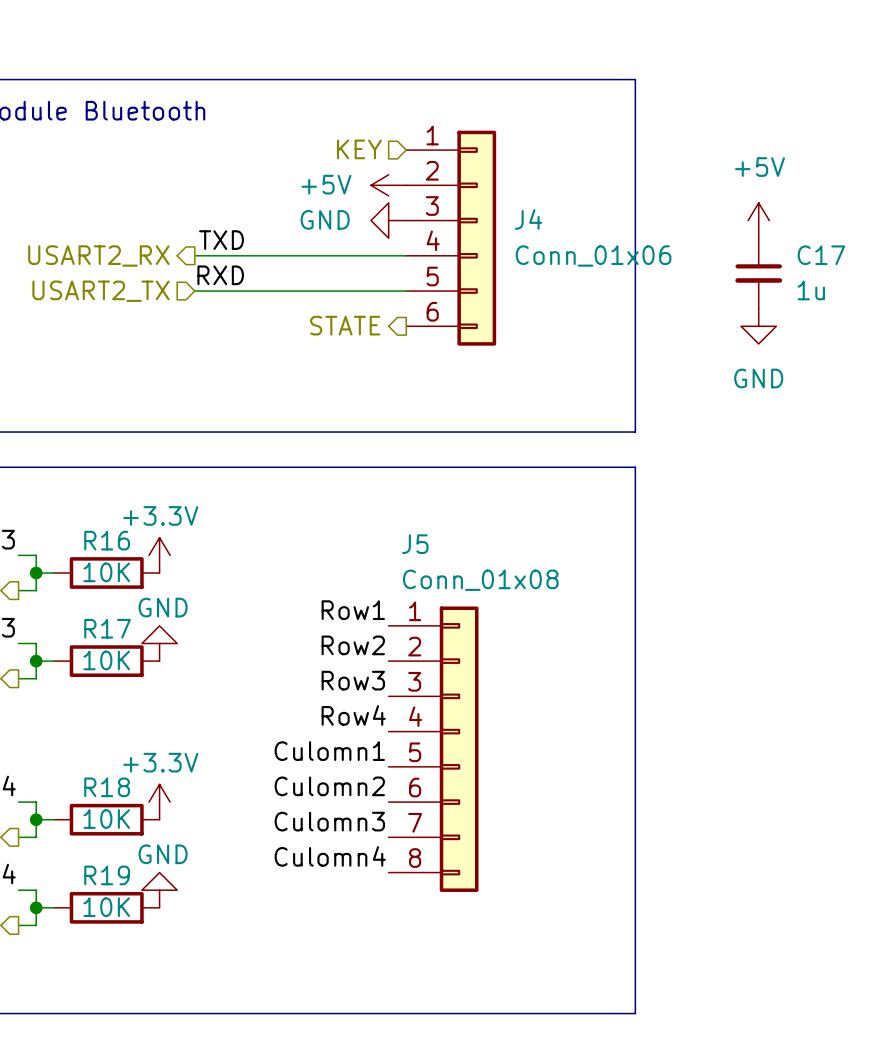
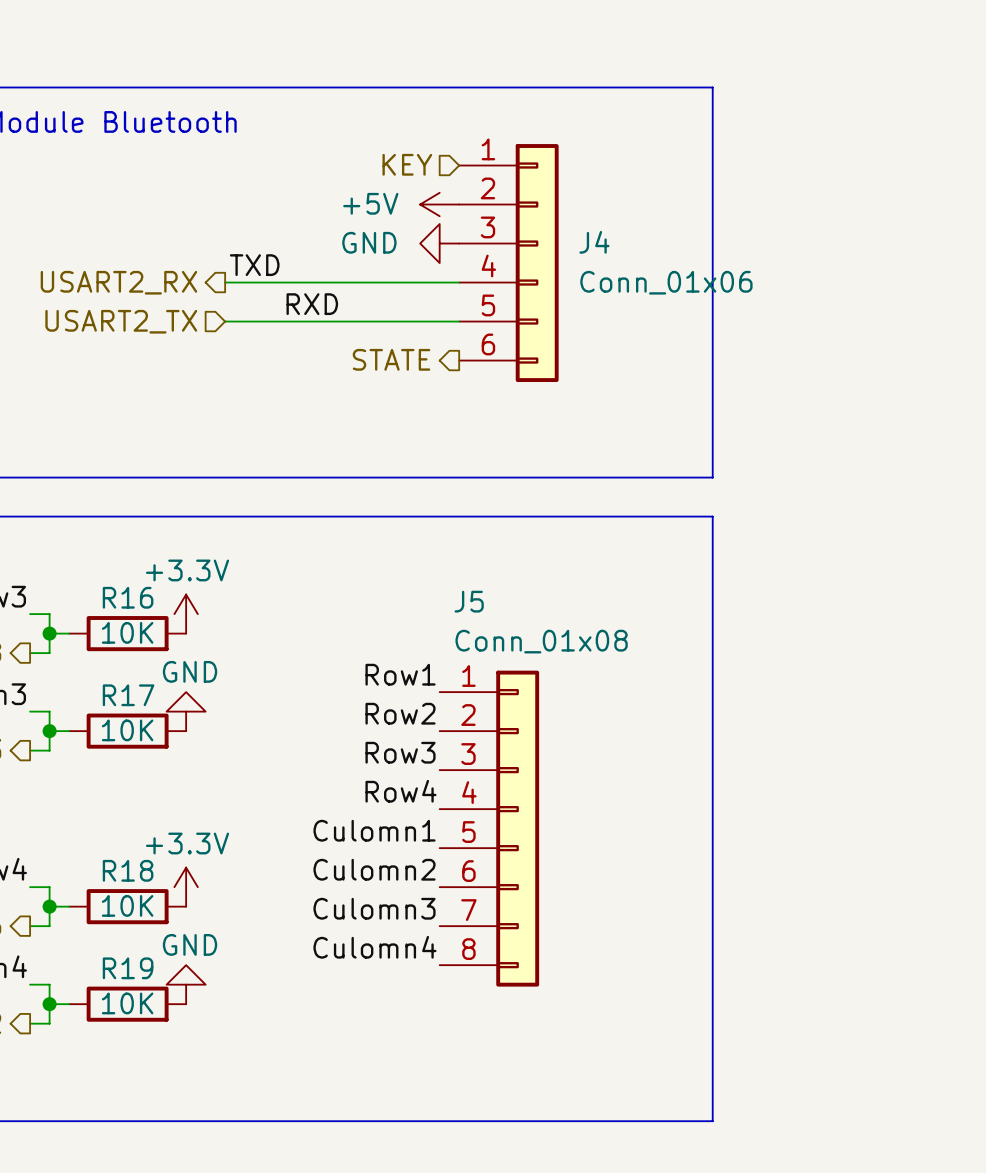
power symbol: +5V (758, 220) -> none
C17: 1u (758, 273) -> none
label position: RXD (220, 275) -> RXD (312, 304)
power symbol: GND (758, 326) -> none

